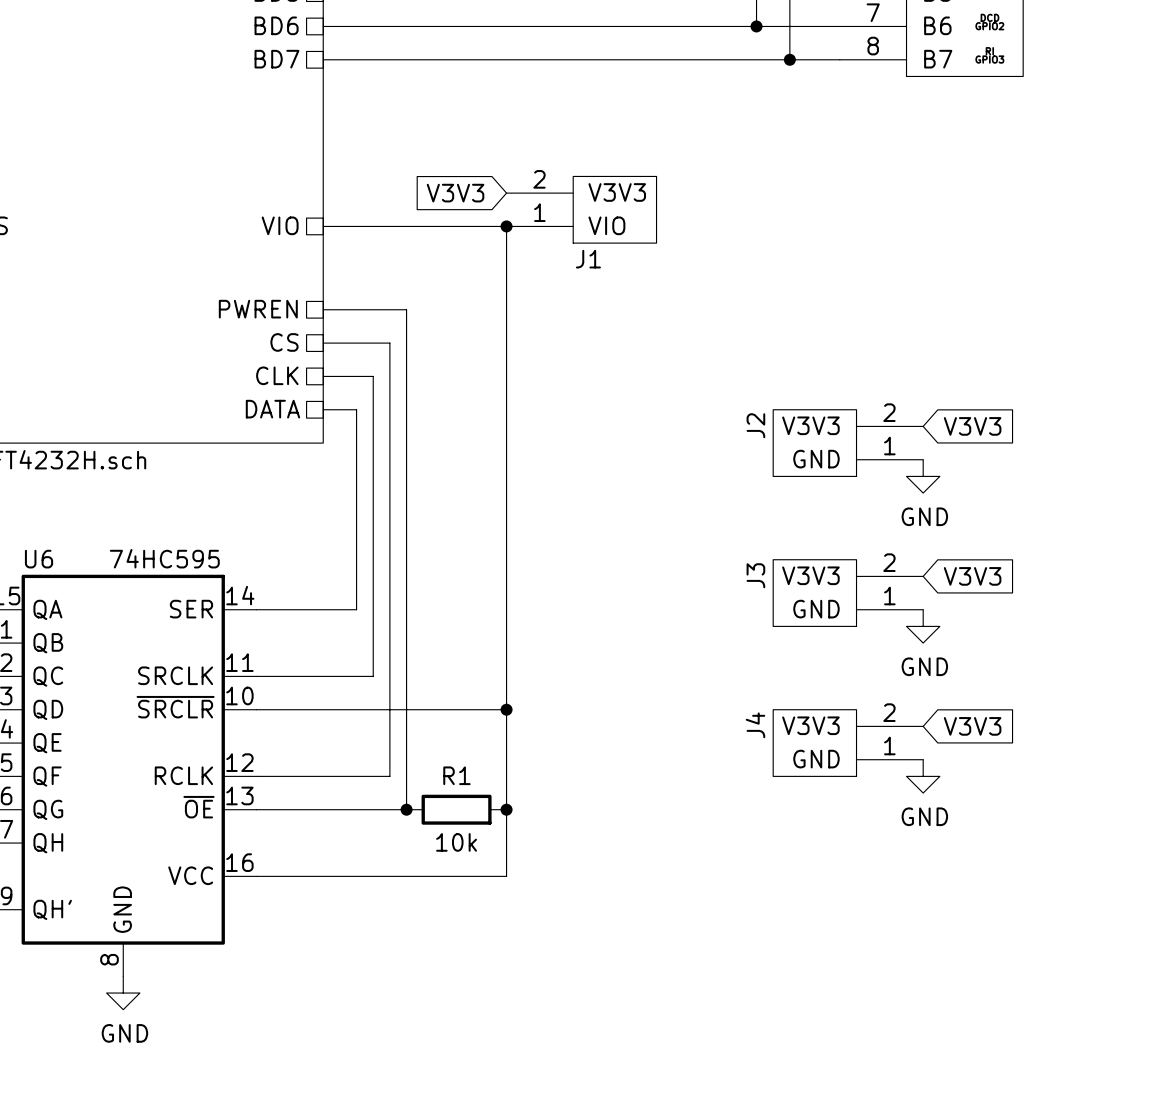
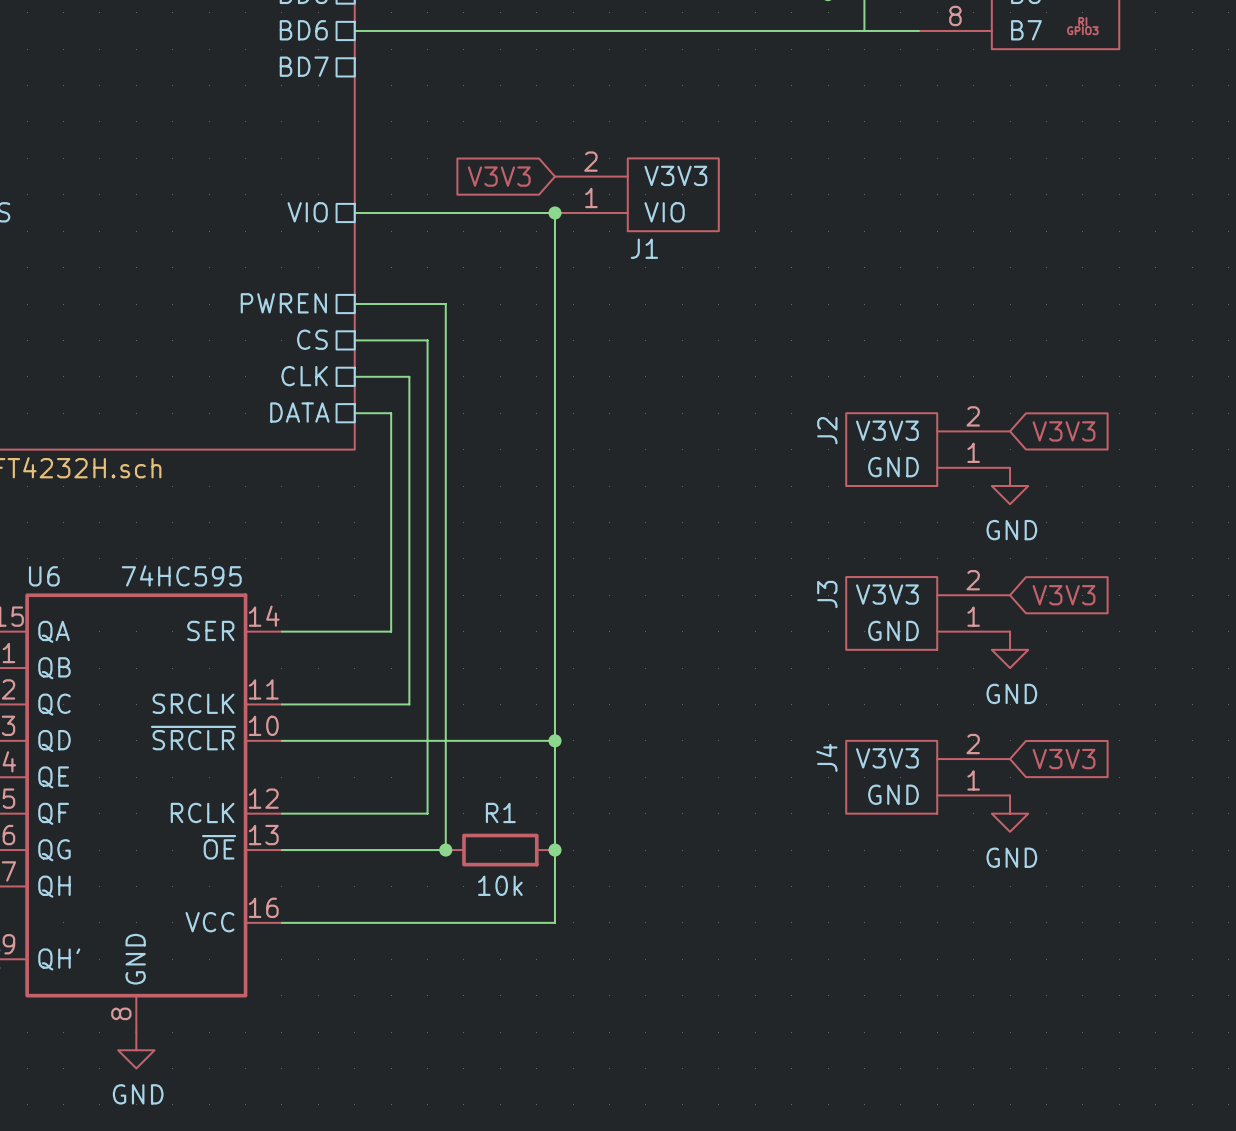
sheet pin: BD7 (276, 59) -> BD6 (303, 30)
junction: (789, 59) -> none
sheet pin: none -> BD7 (304, 66)

